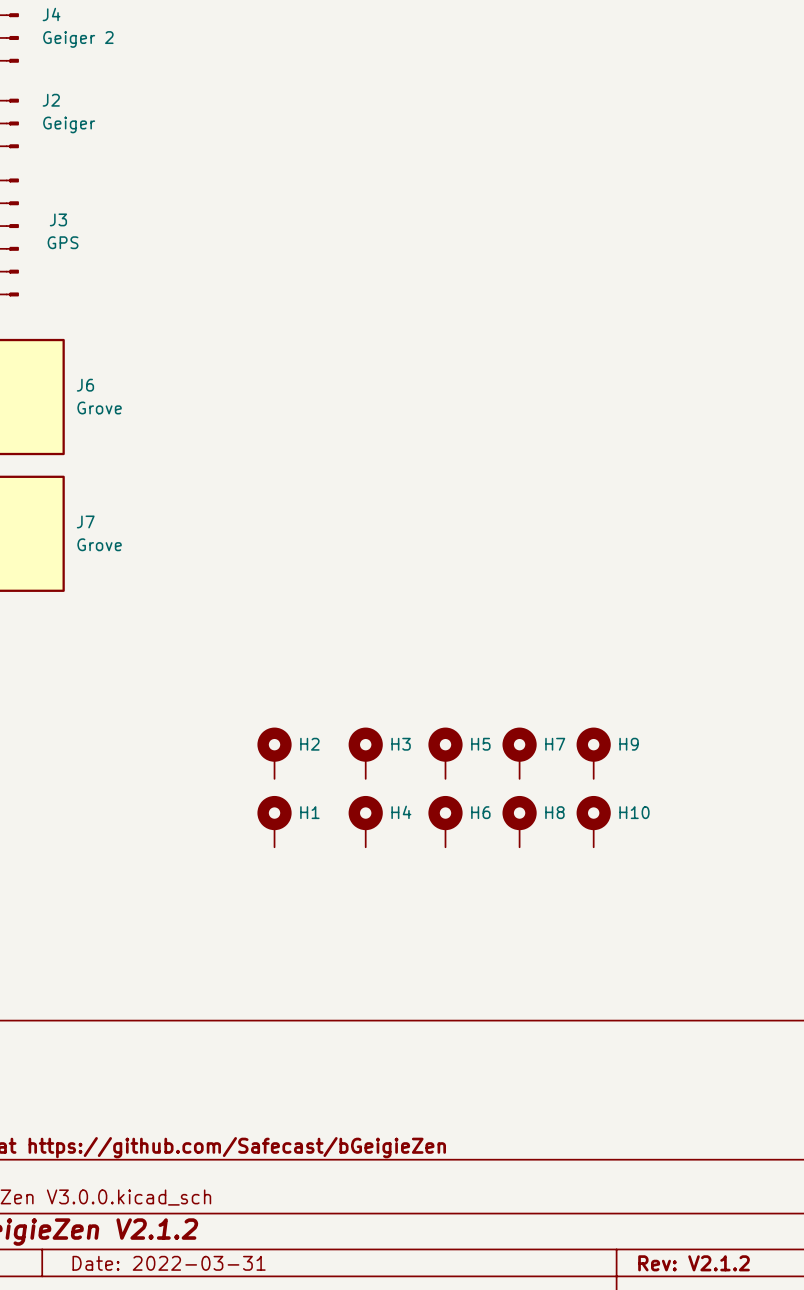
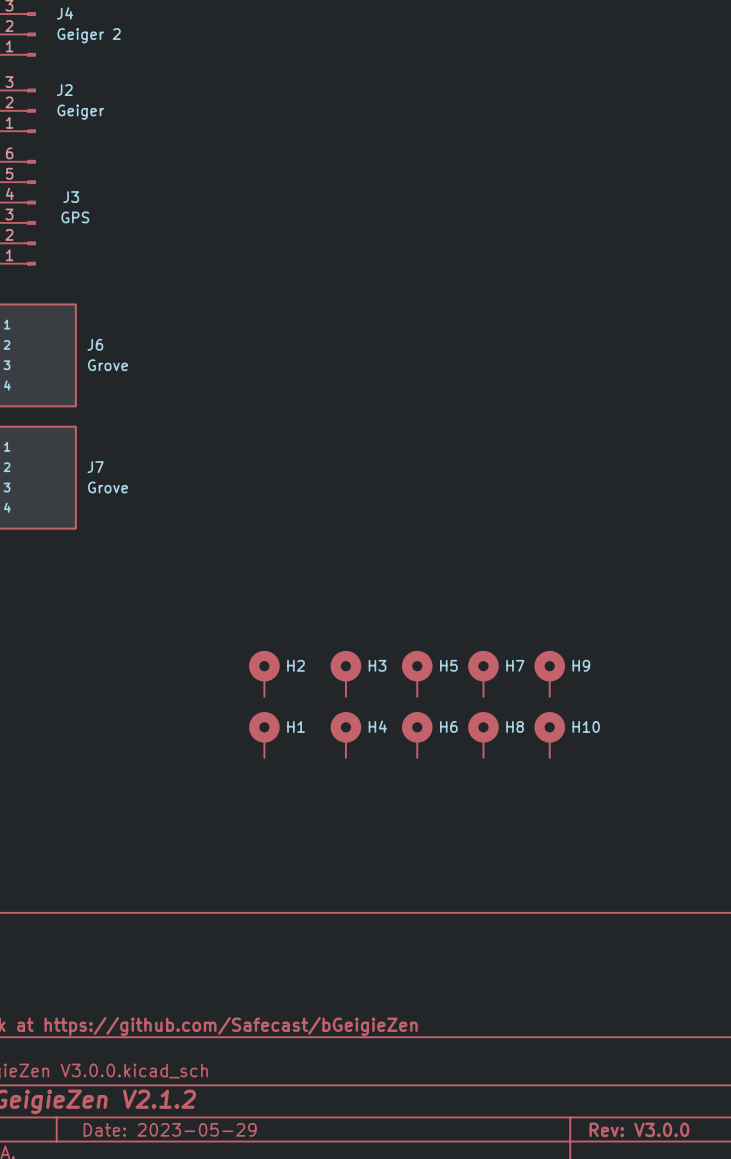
title block: Date: 2022-03-31 (169, 1263) -> Date: 2023-05-29 (170, 1129)
title block: Rev: V2.1.2 (694, 1263) -> Rev: V3.0.0 (639, 1129)

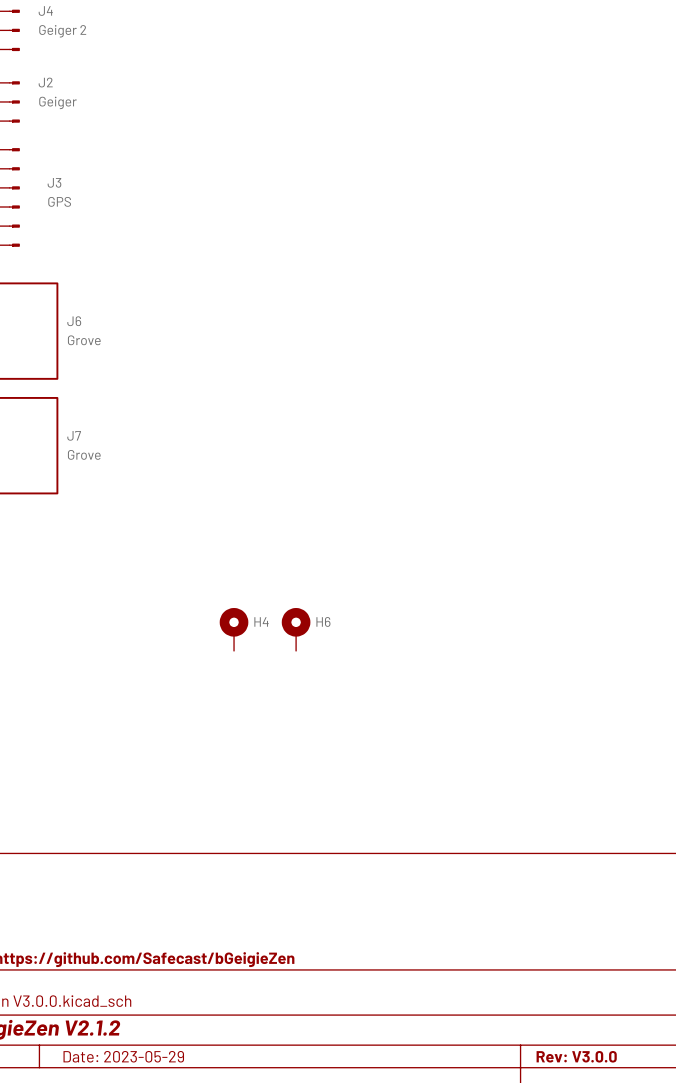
H2 name: H2 (296, 665) -> H4 (261, 621)
H3: (345, 673) -> none
H5: (417, 673) -> none
H7: (483, 673) -> none
H9: (549, 673) -> none
H1: (264, 734) -> none
H4: (345, 734) -> none
H6 position: (417, 734) -> (296, 629)
H8: (483, 734) -> none
H10: (549, 734) -> none

